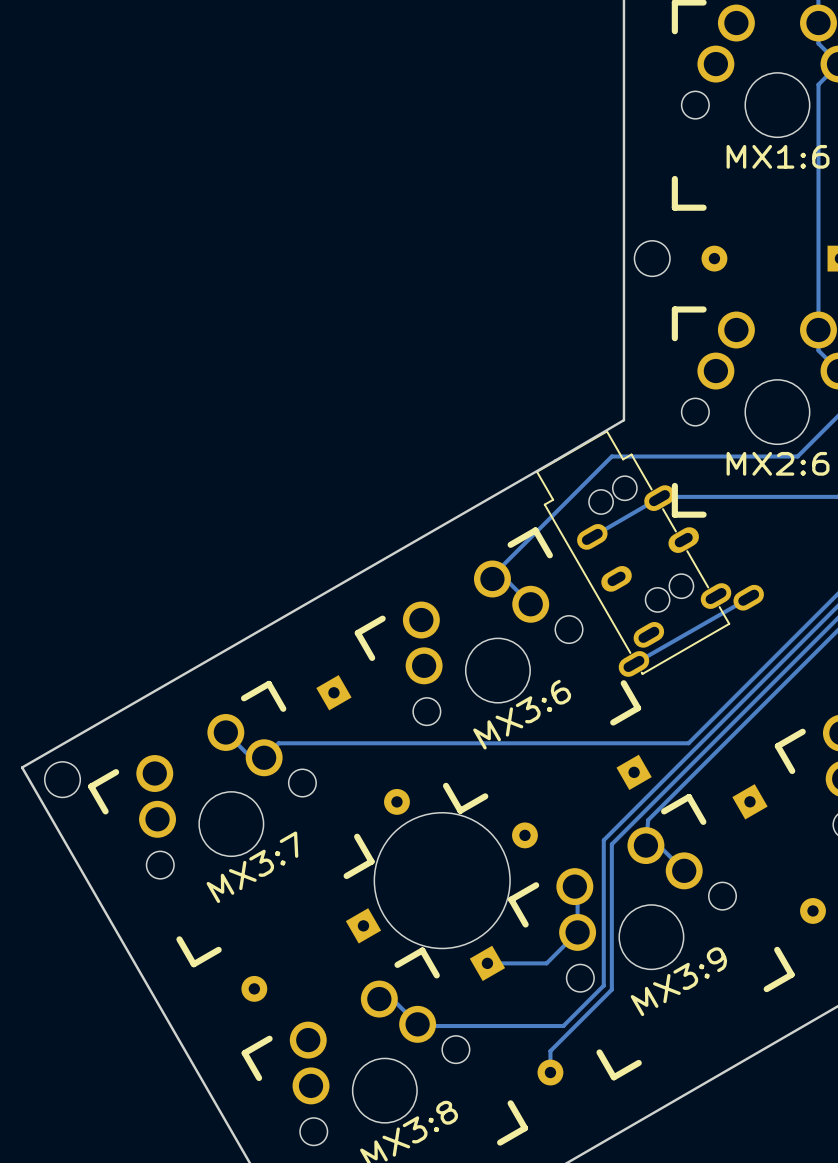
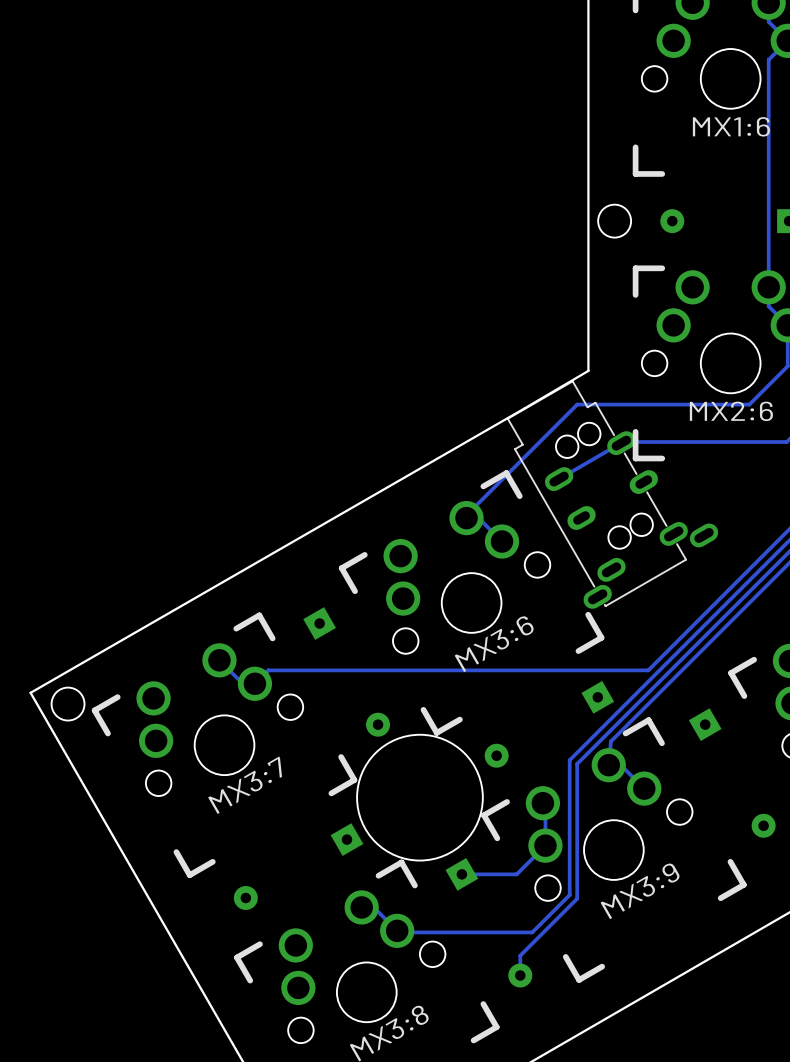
track: (748, 597) (633, 663) -> none

